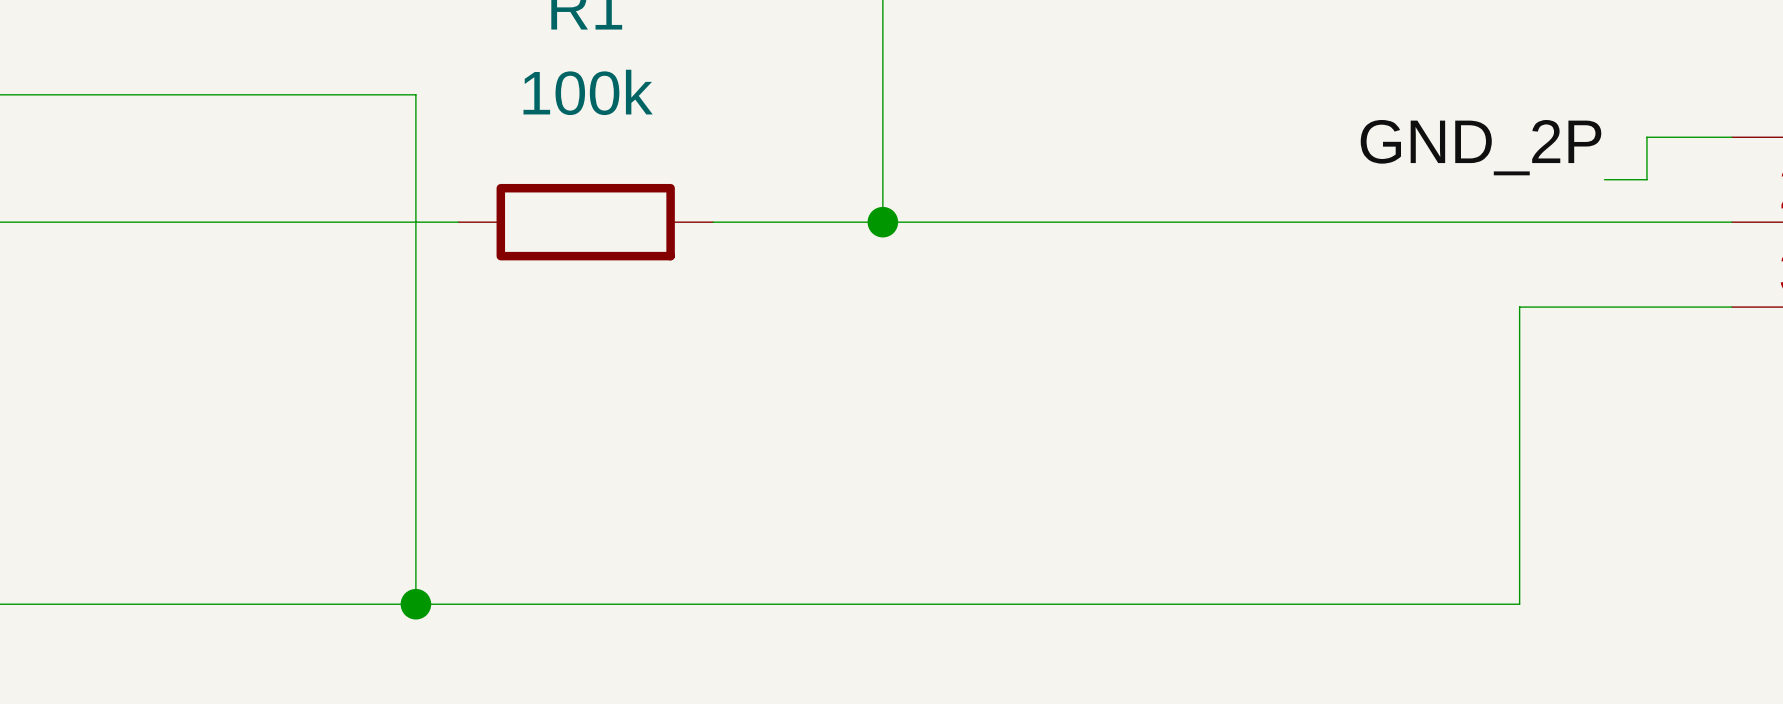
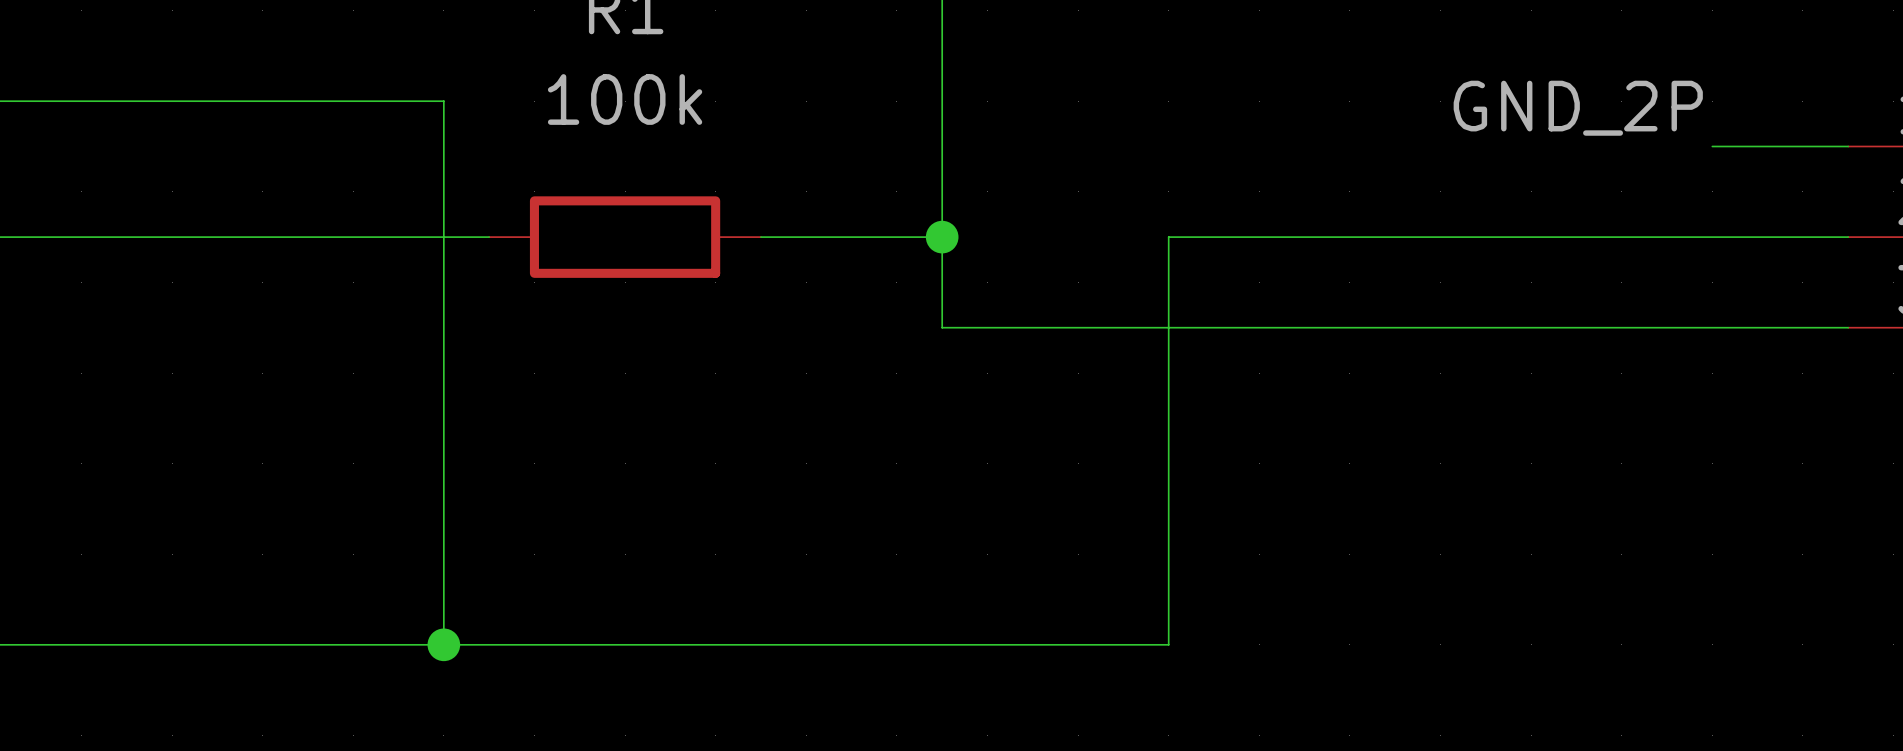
wire: (1646, 137) (1646, 179) (1604, 179) -> (1757, 146) (1712, 146)
label position: GND_2P (1481, 147) -> GND_2P (1578, 108)
wire: (882, 222) (1095, 222) -> (942, 237) (942, 327) (1621, 327)
wire: (1519, 307) (1519, 604) (1095, 604) -> (1168, 237) (1168, 644)

